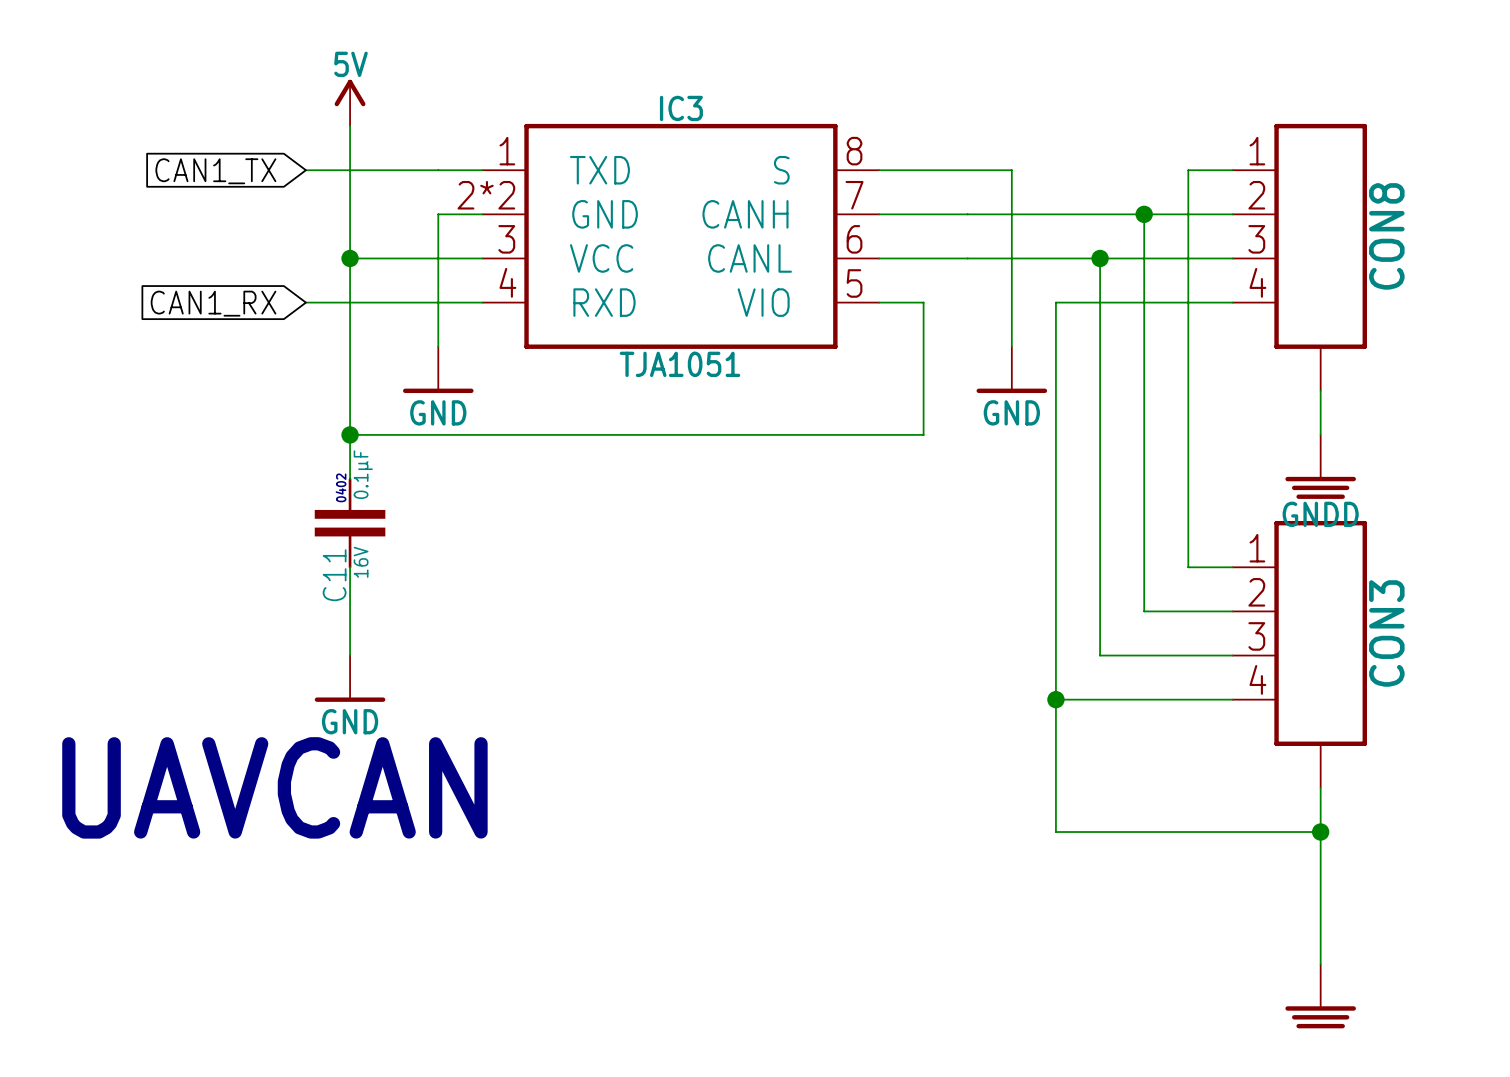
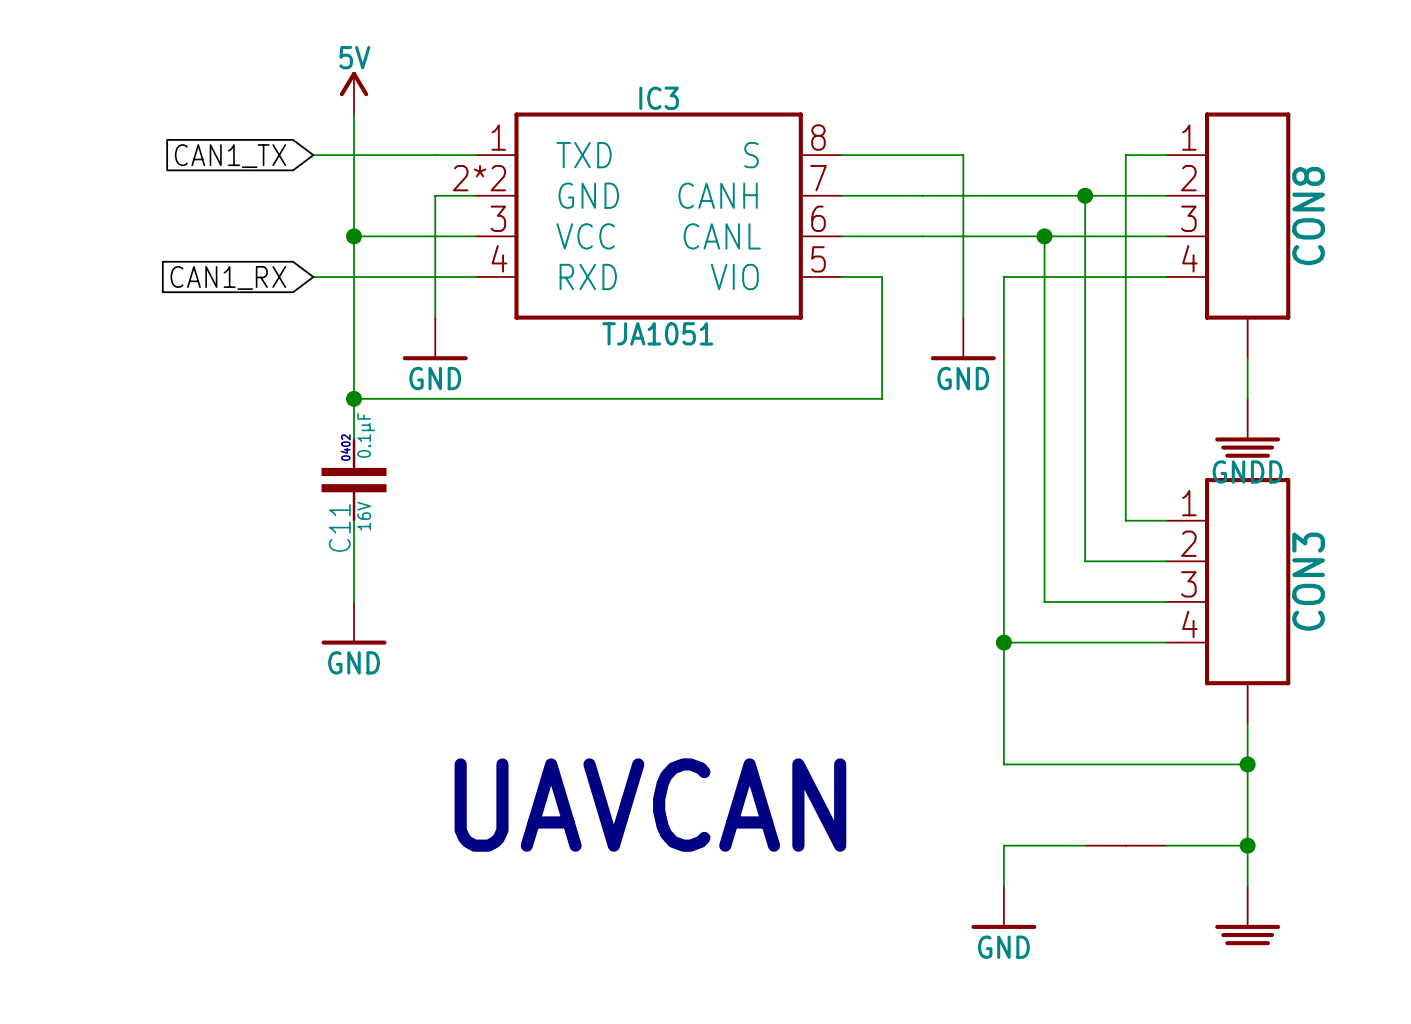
text position: UAVCAN (274, 787) -> UAVCAN (650, 805)
wire: none -> (1085, 845) (1003, 845) (1003, 886)
part: none -> (1125, 845)
wire: none -> (1166, 845) (1247, 845)
junction: none -> (1247, 845)
power symbol: none -> GND (1003, 907)

